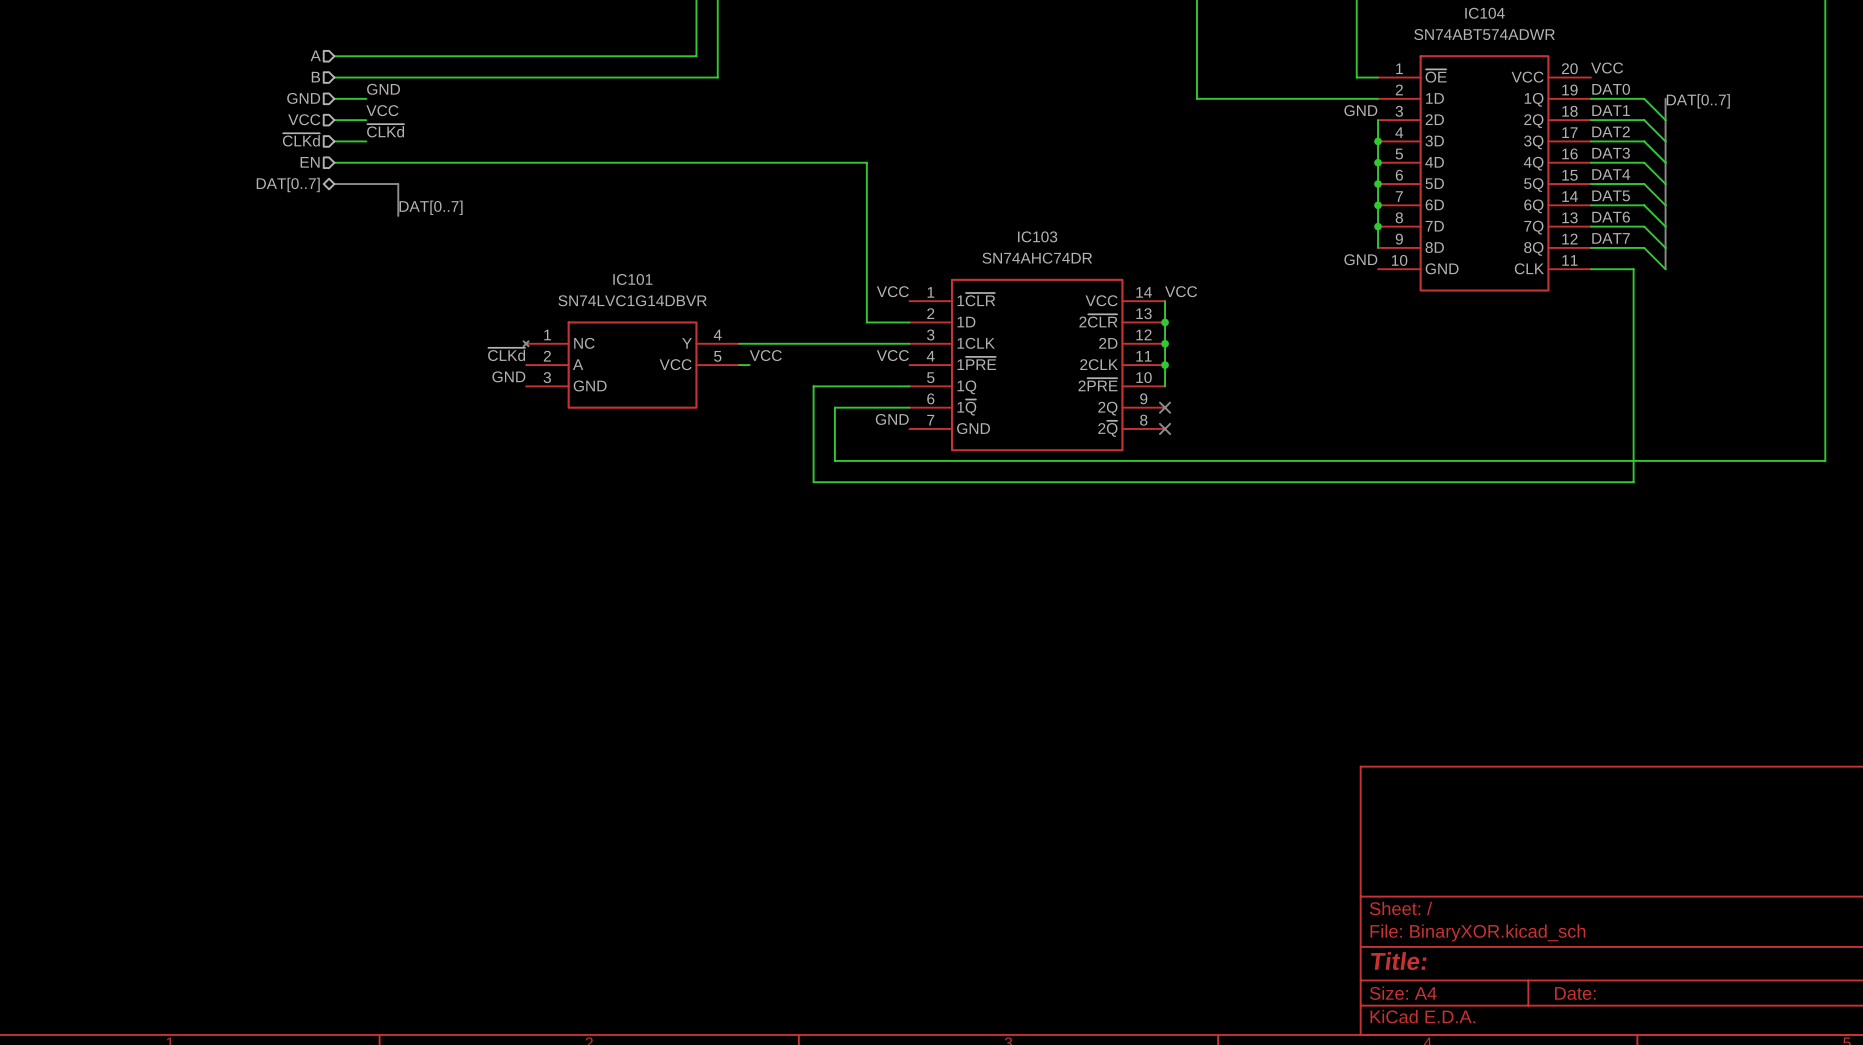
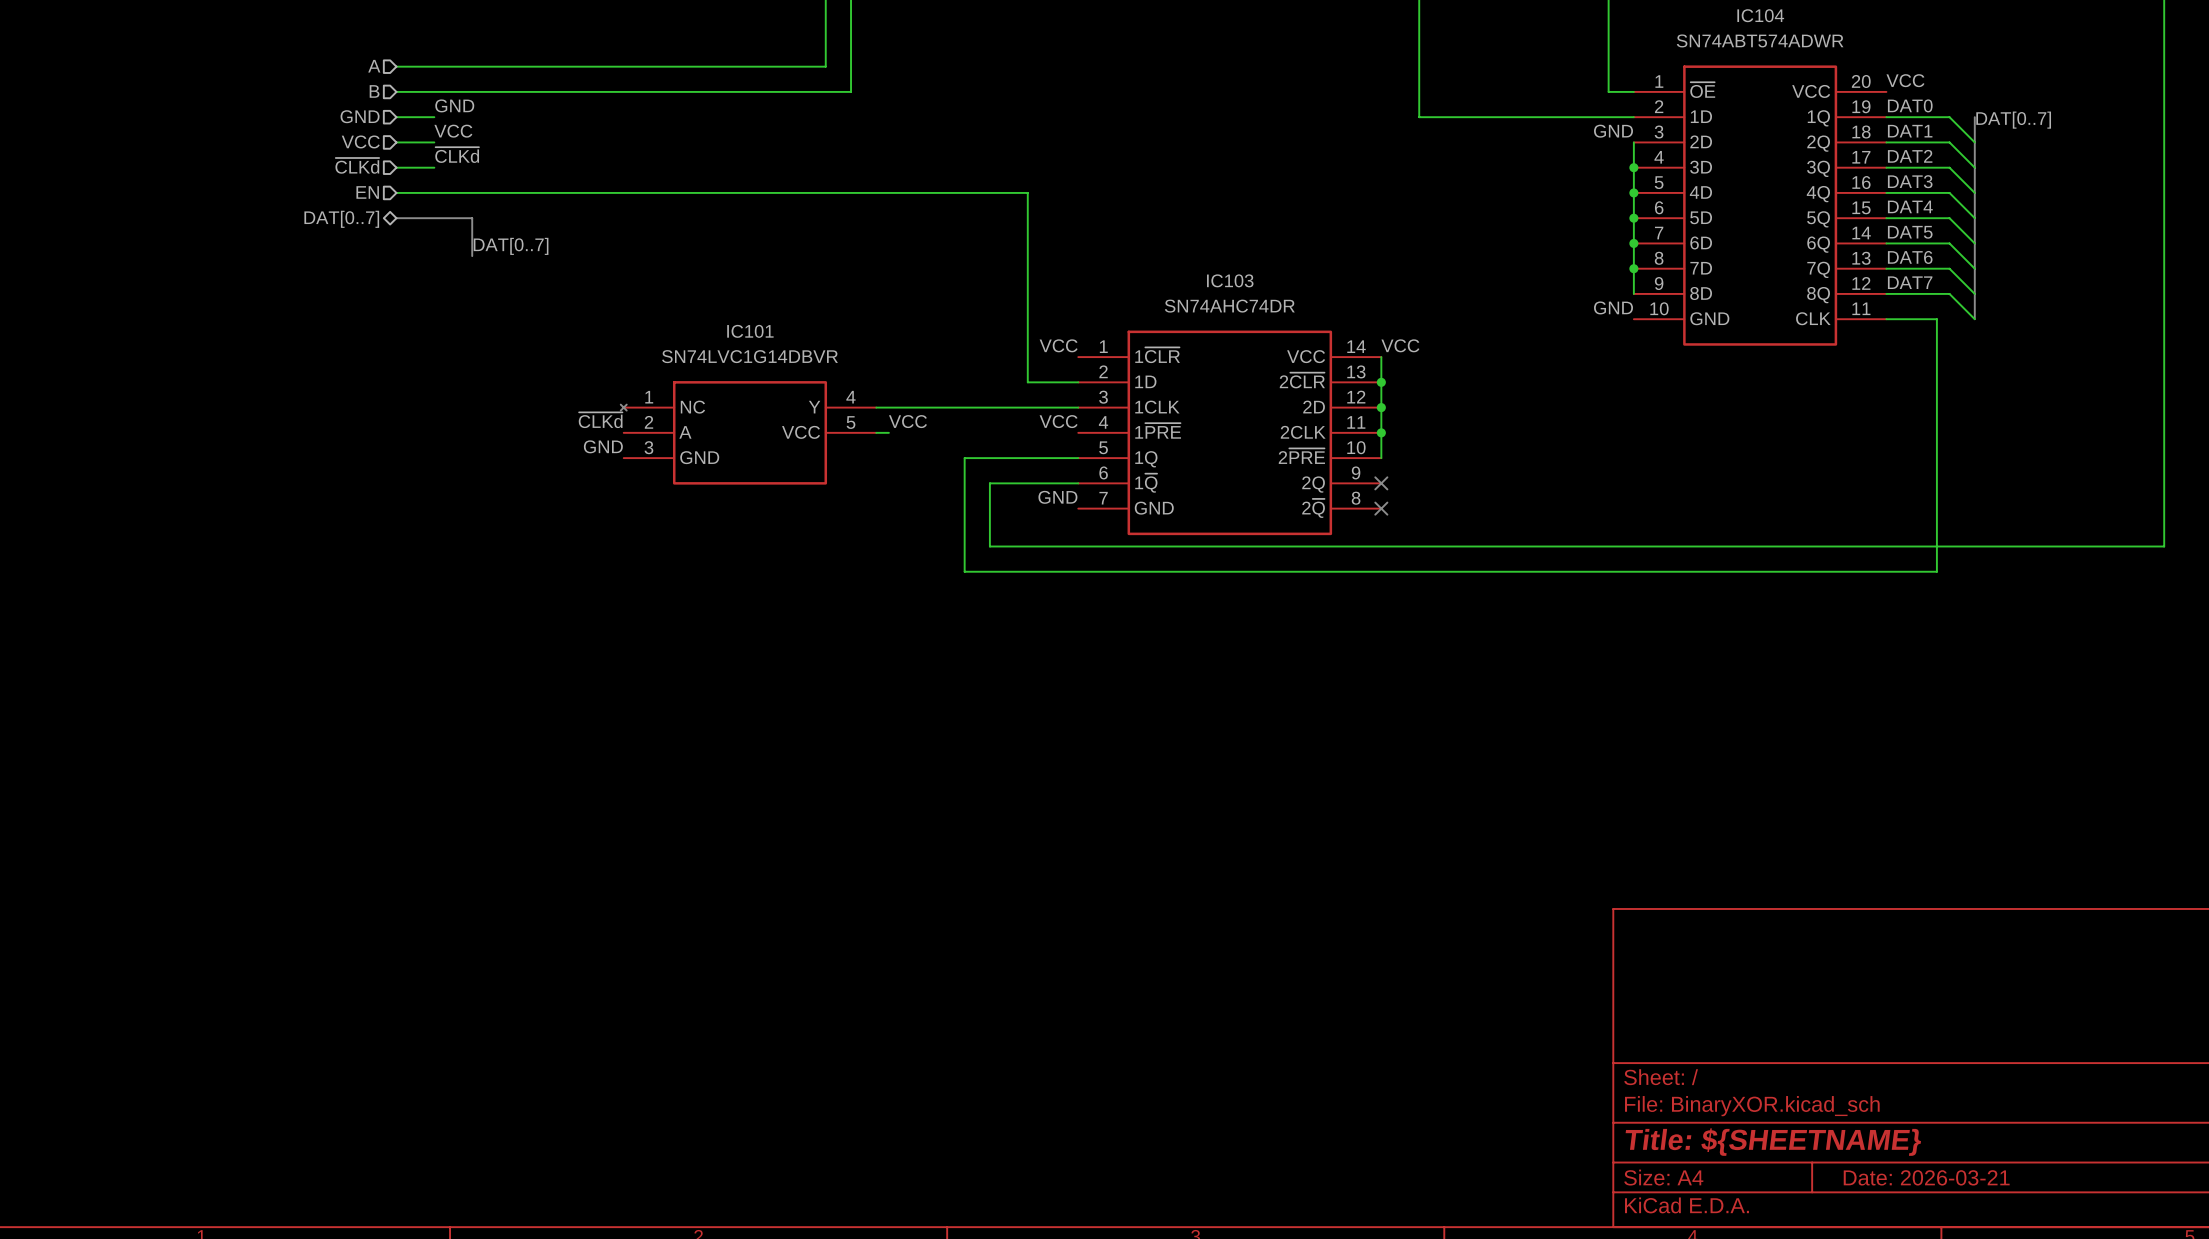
title block: Title: (1398, 961) -> Title: ${SHEETNAME} (1773, 1142)
title block: Date: (1575, 993) -> Date: 2026-03-21 (1926, 1177)

